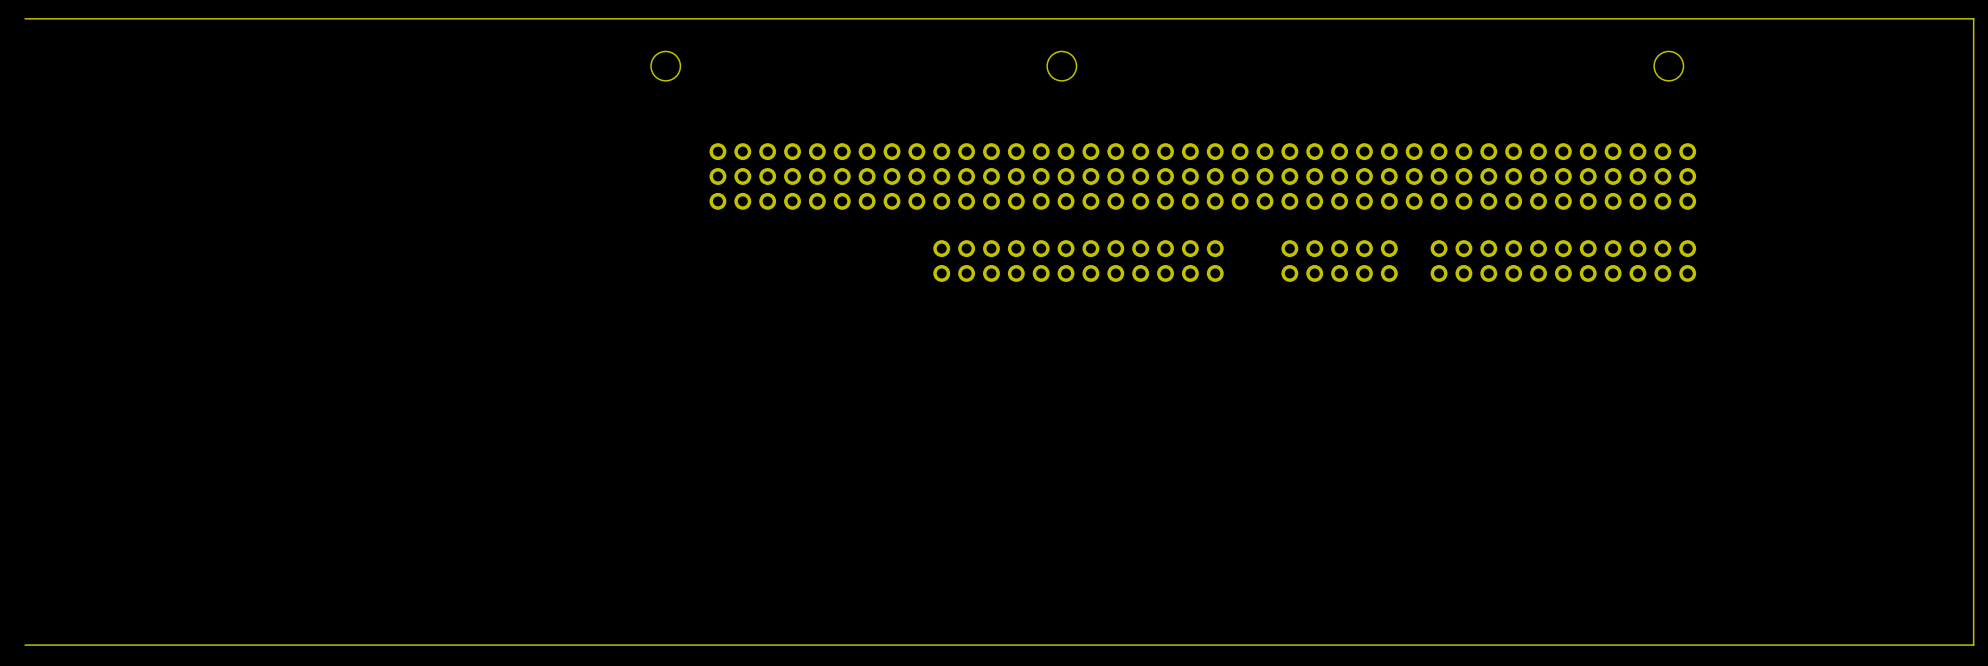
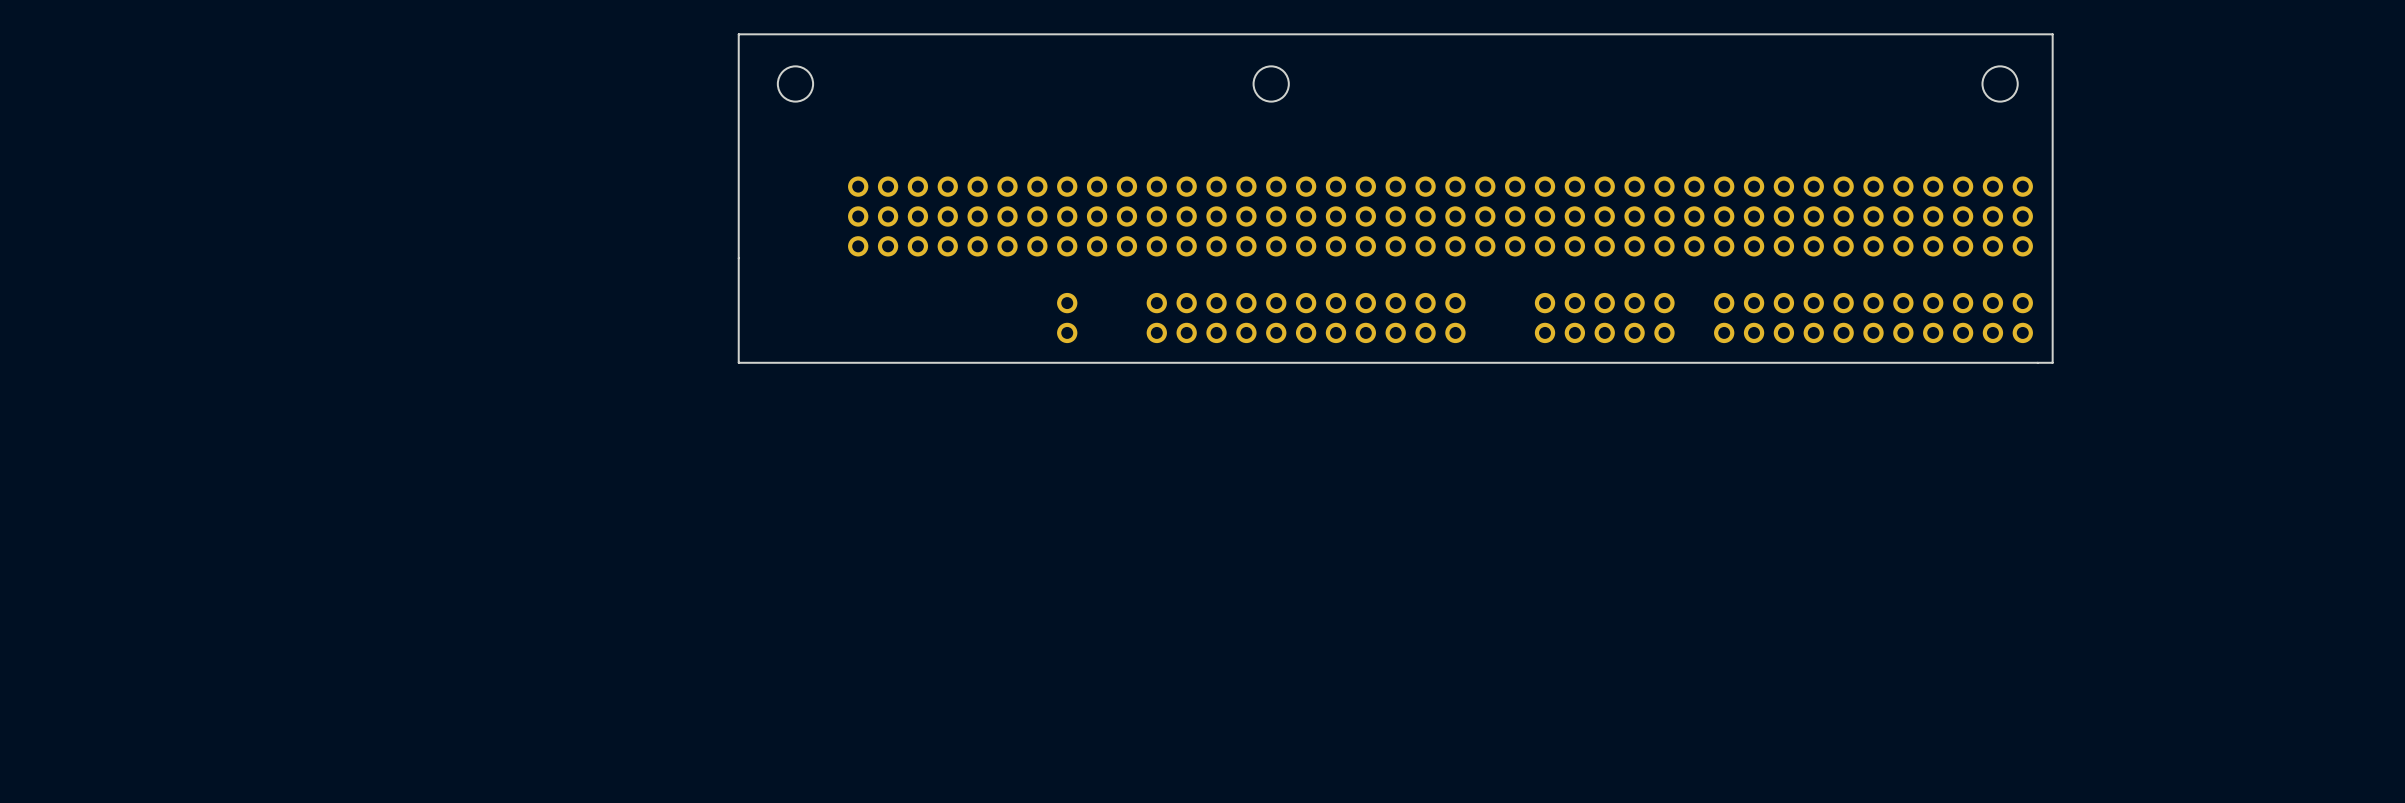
board edge: (25, 18) (1973, 18) (1973, 645) (25, 645) -> none
board edge: none -> (2052, 34) (2052, 362) (738, 362) (738, 34) (2052, 34)
part position: (941, 261) -> (1067, 318)

